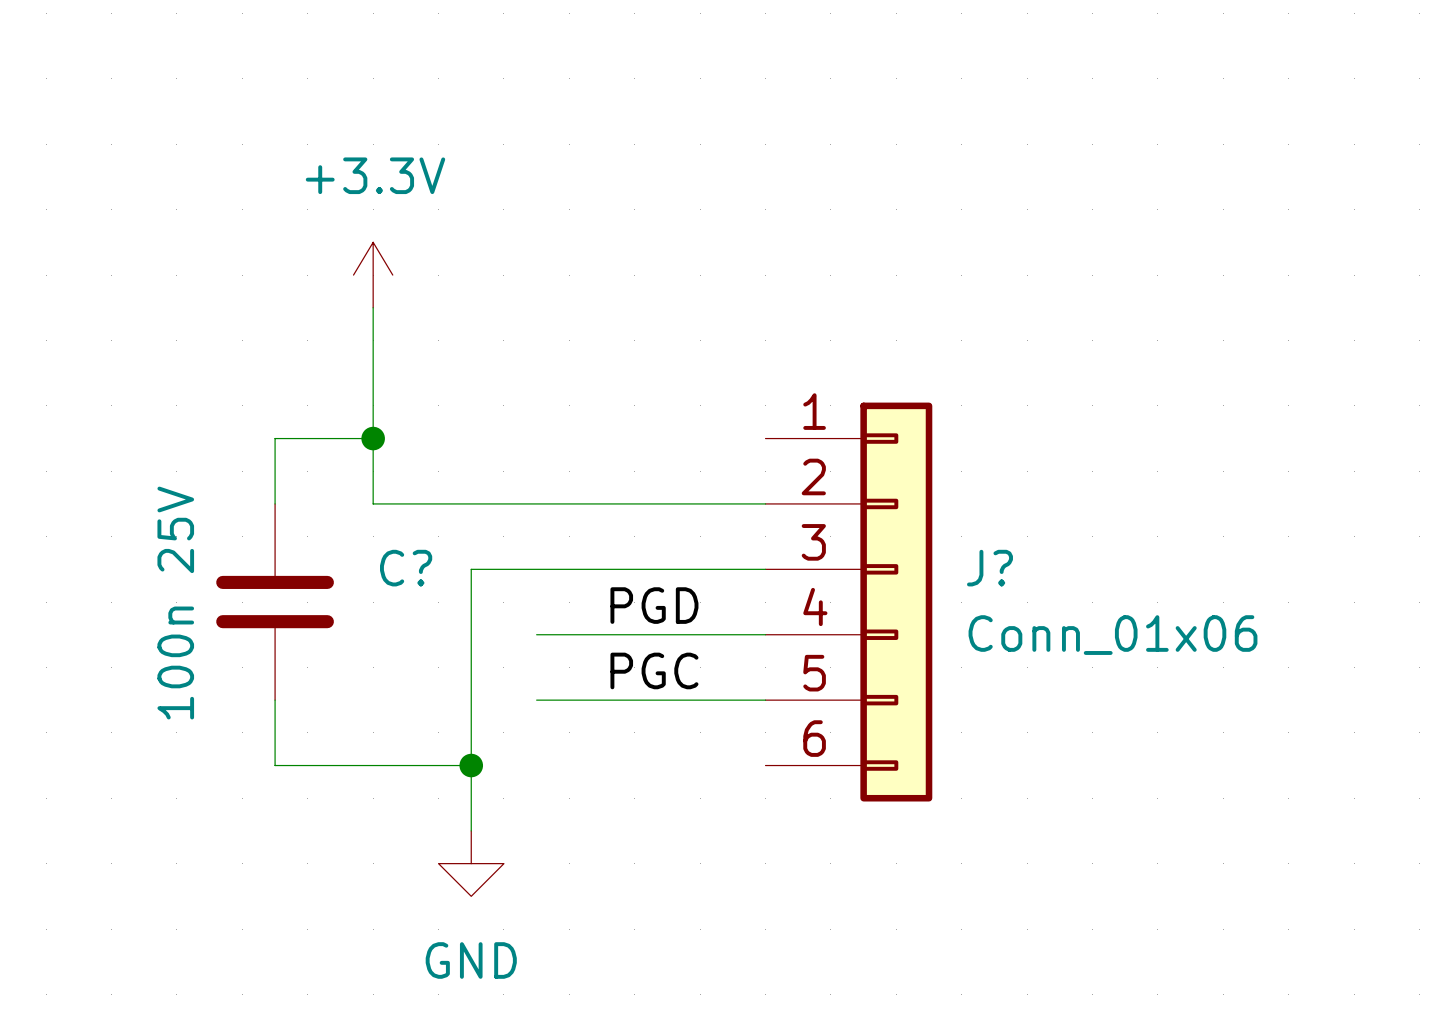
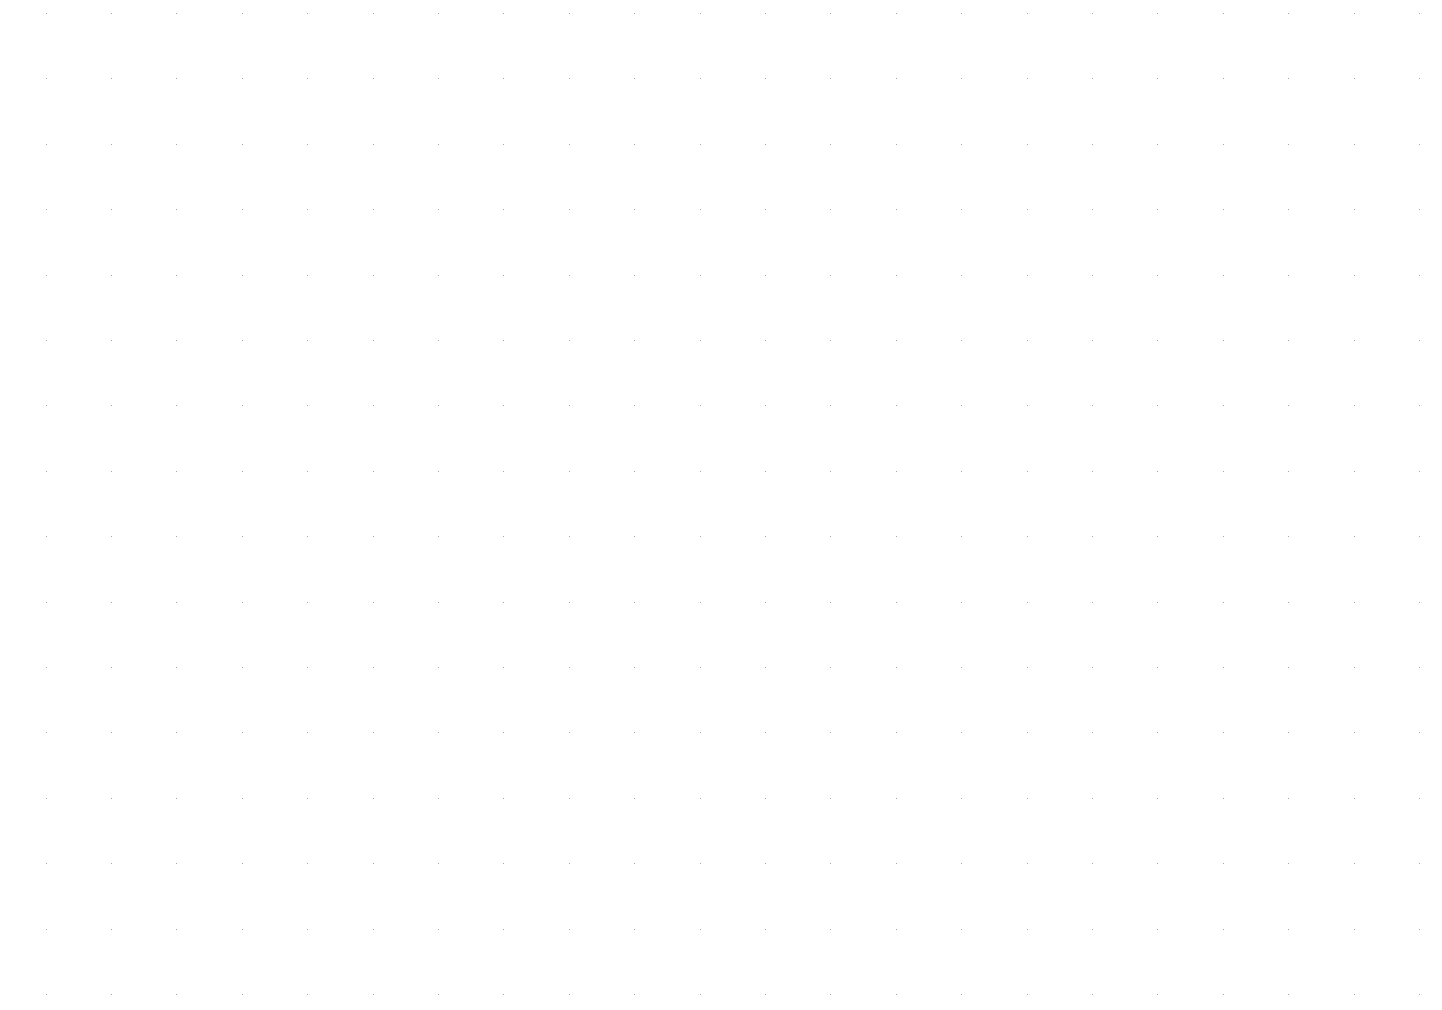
power symbol: +3.3V (373, 275) -> none
wire: (373, 307) (373, 503) (765, 503) -> none
wire: (373, 438) (275, 438) (275, 503) -> none
junction: (373, 438) -> none
wire: (765, 569) (471, 569) (471, 830) -> none
C?: 100n 25V (275, 602) -> none
J?: Conn_01x06 (848, 602) -> none
label: PGD (654, 605) -> none
wire: (536, 634) (765, 634) -> none
label: PGC (654, 670) -> none
wire: (275, 700) (275, 765) (471, 765) -> none
wire: (536, 700) (765, 700) -> none
junction: (471, 765) -> none
power symbol: GND (471, 863) -> none

